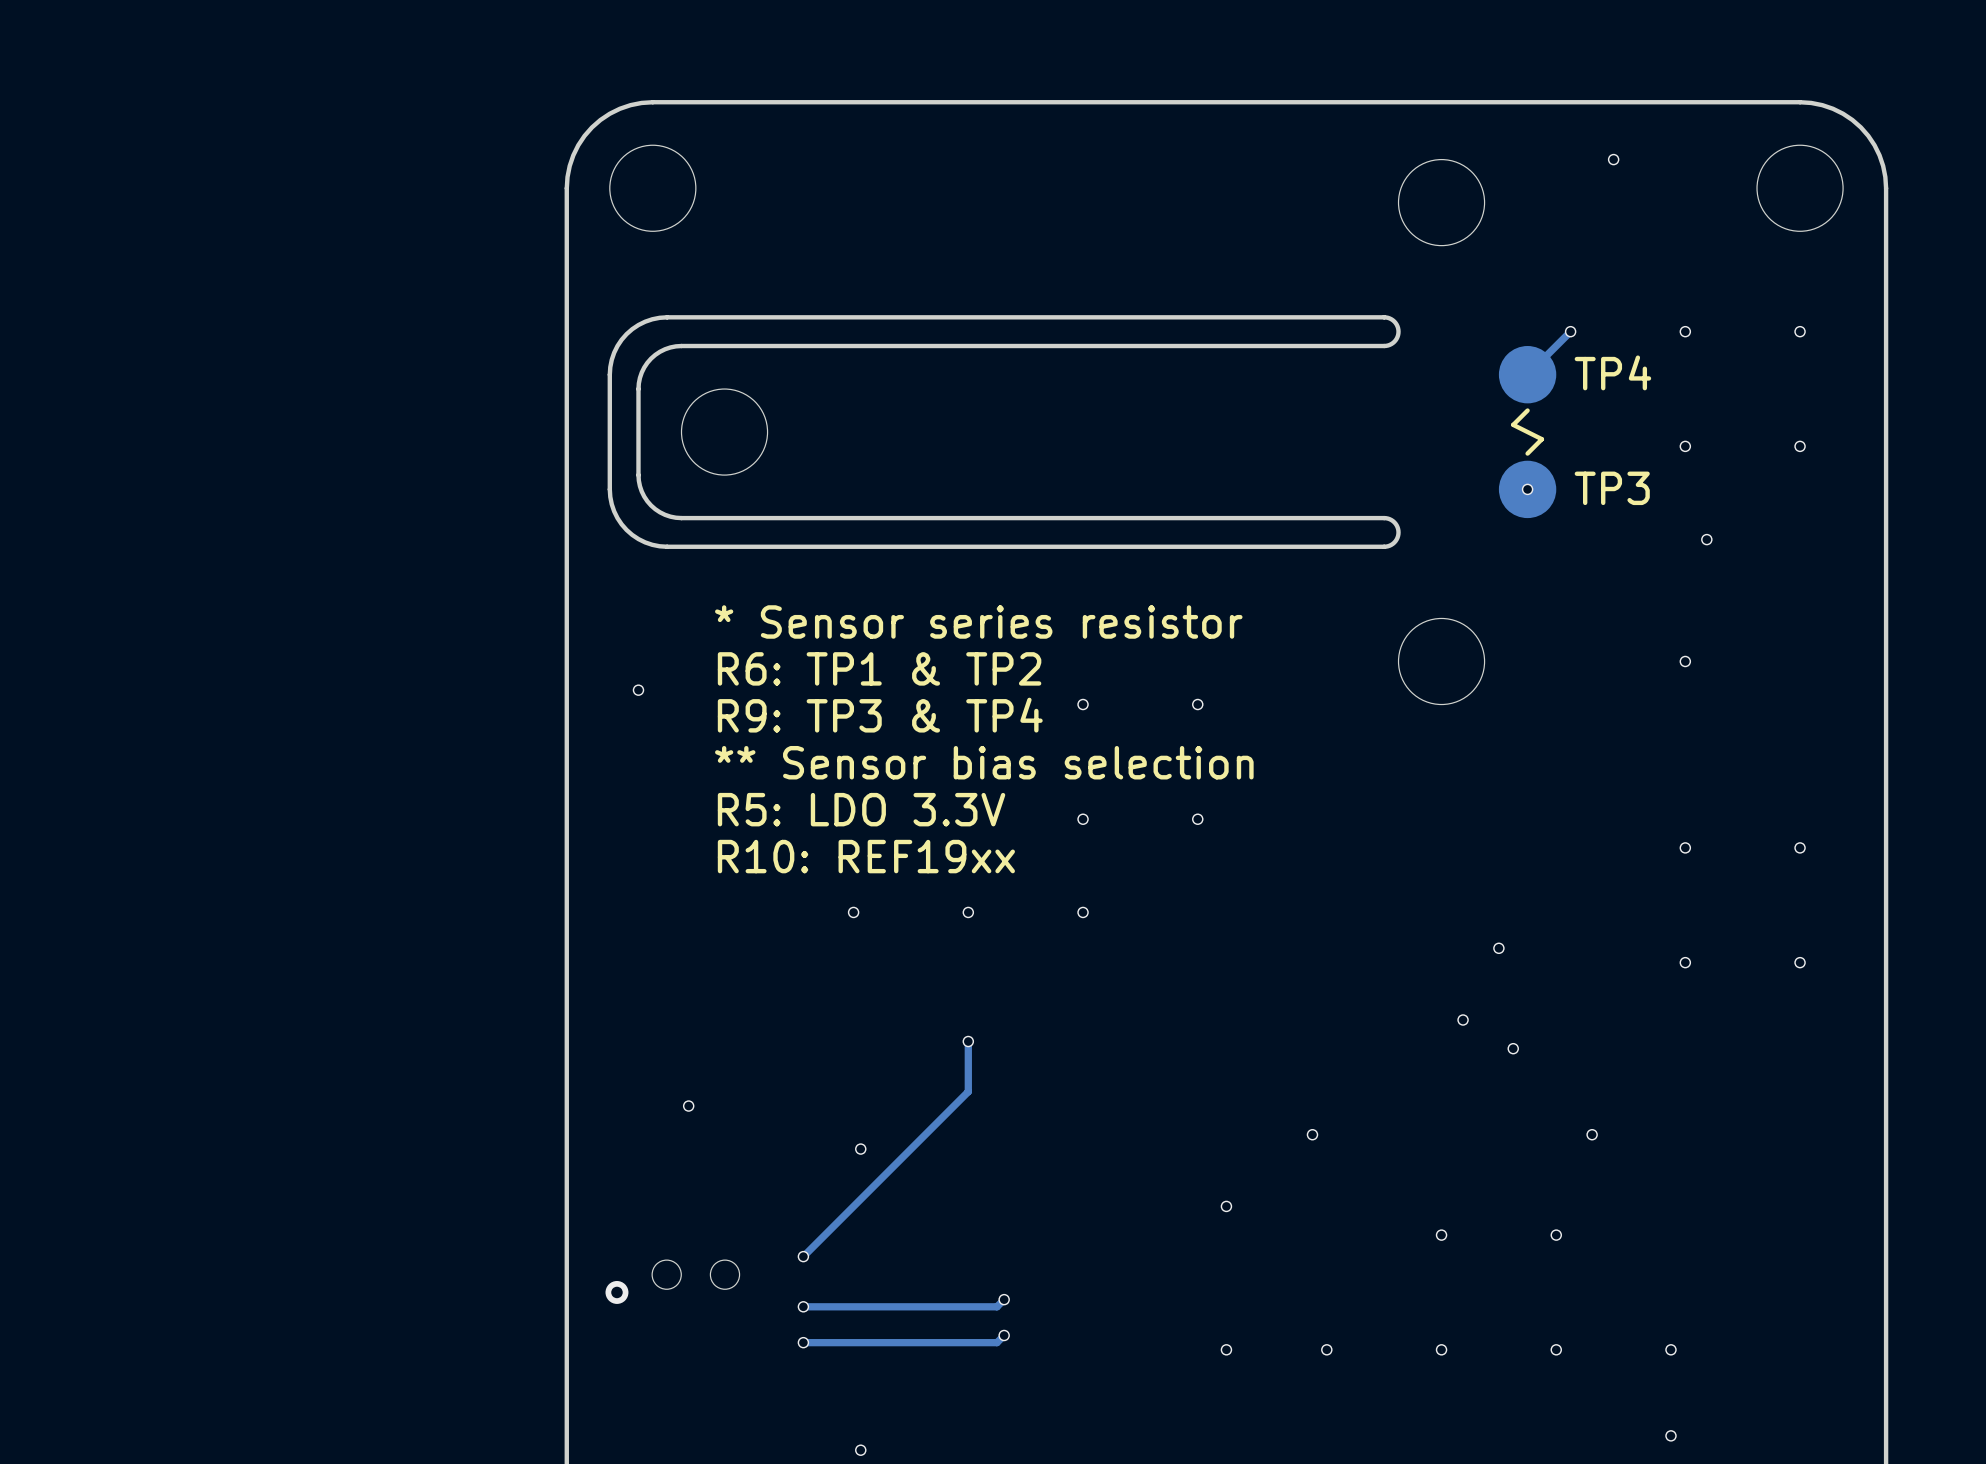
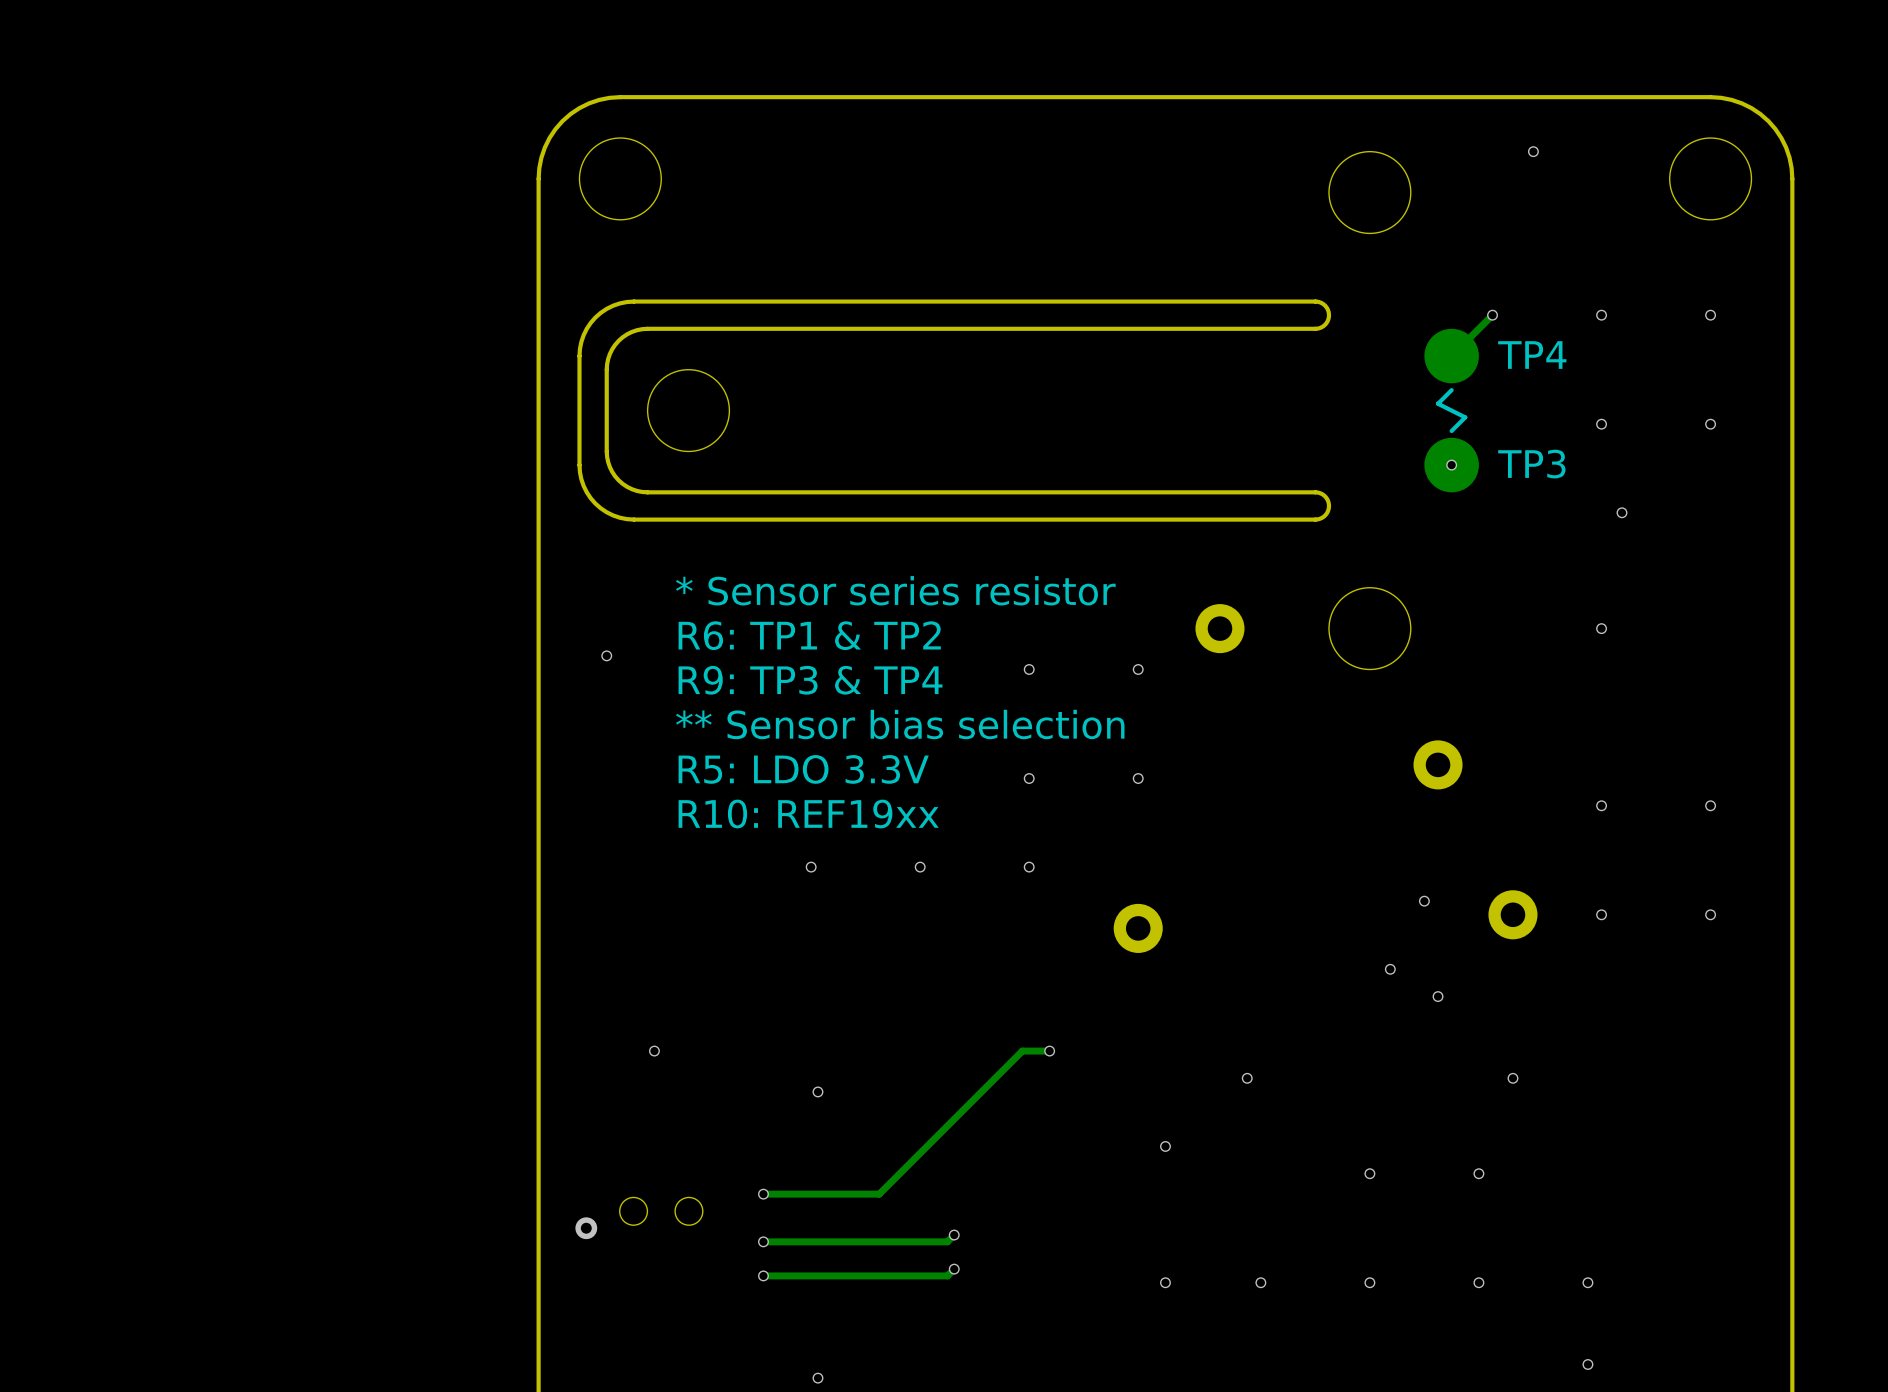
part: none -> (1219, 628)
part: none -> (1438, 764)
part: none -> (1512, 914)
part: none -> (1138, 928)
track: (968, 1041) (968, 1091) (803, 1256) -> (1049, 1051) (1022, 1051) (879, 1194) (763, 1194)
via position: (968, 1041) -> (1049, 1051)

